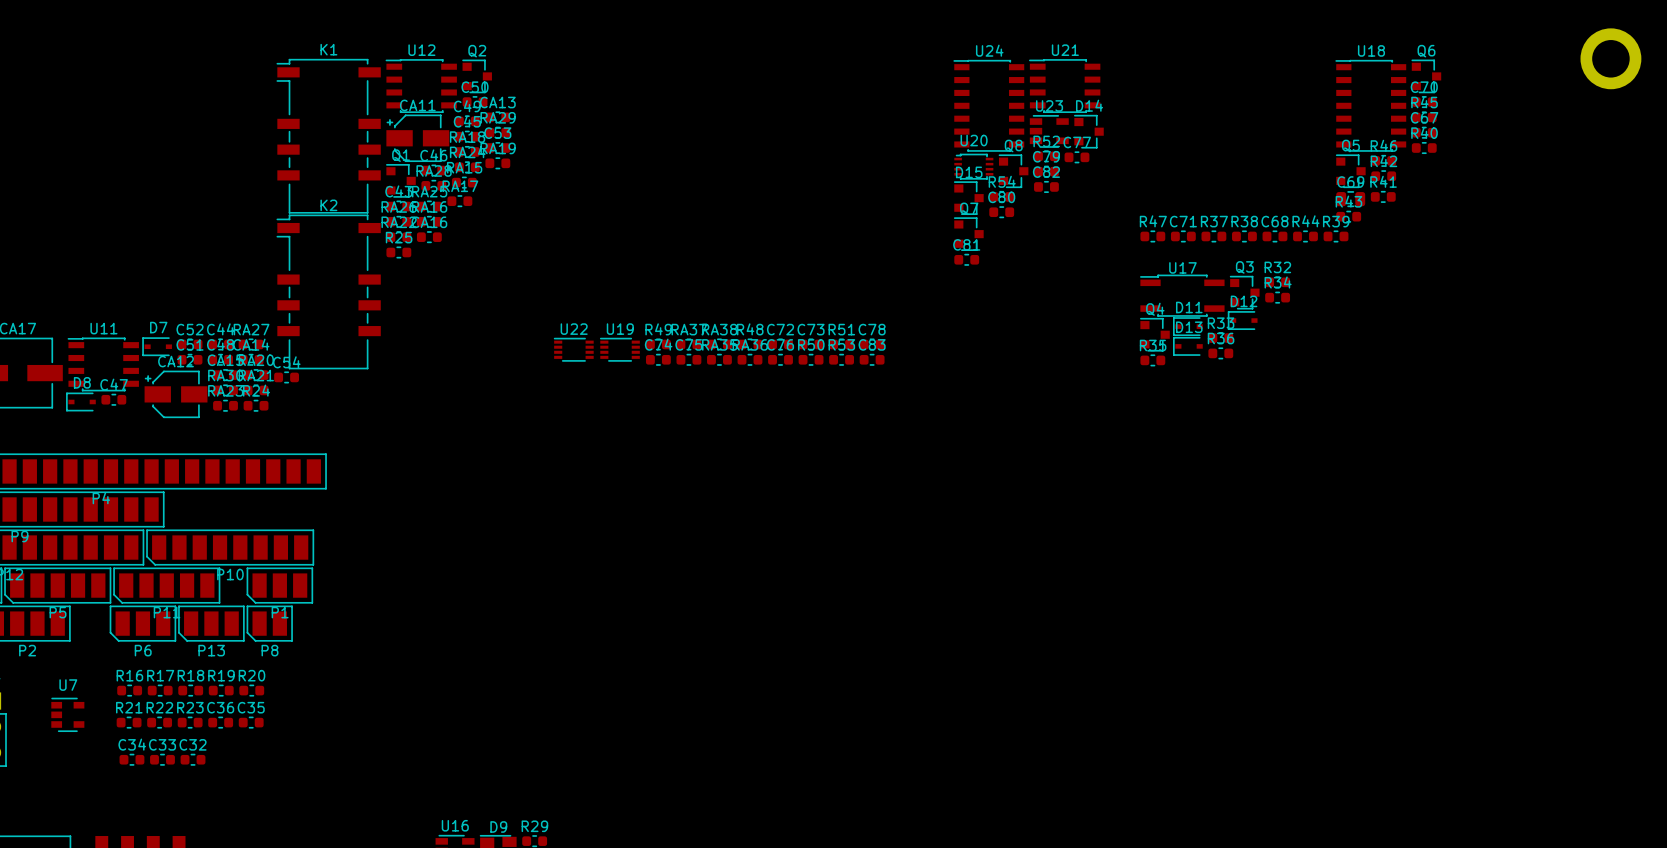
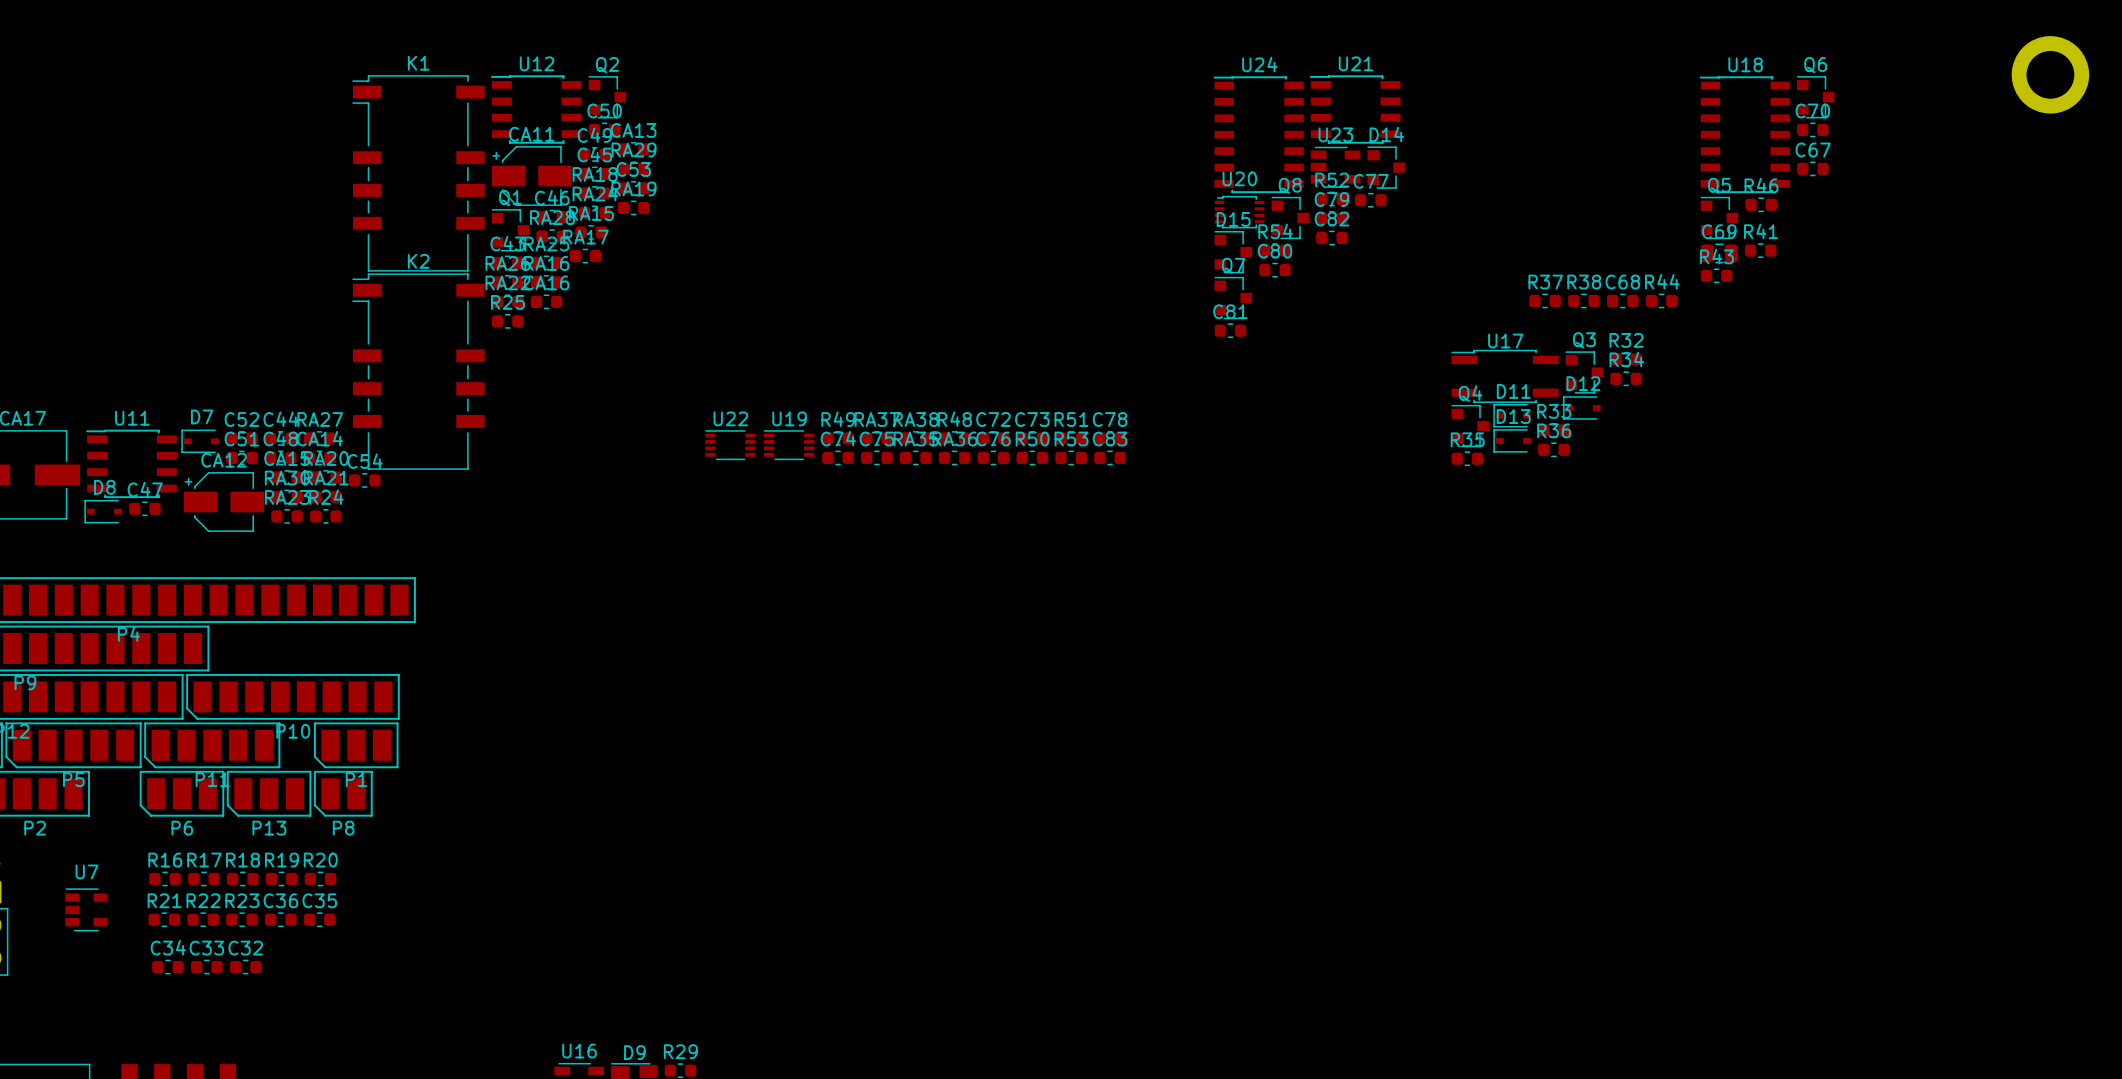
R45: (1424, 117) -> none
R40: (1424, 148) -> none
R42: (1383, 176) -> none
R47: (1152, 236) -> none
C71: (1183, 236) -> none
R39: (1336, 236) -> none

